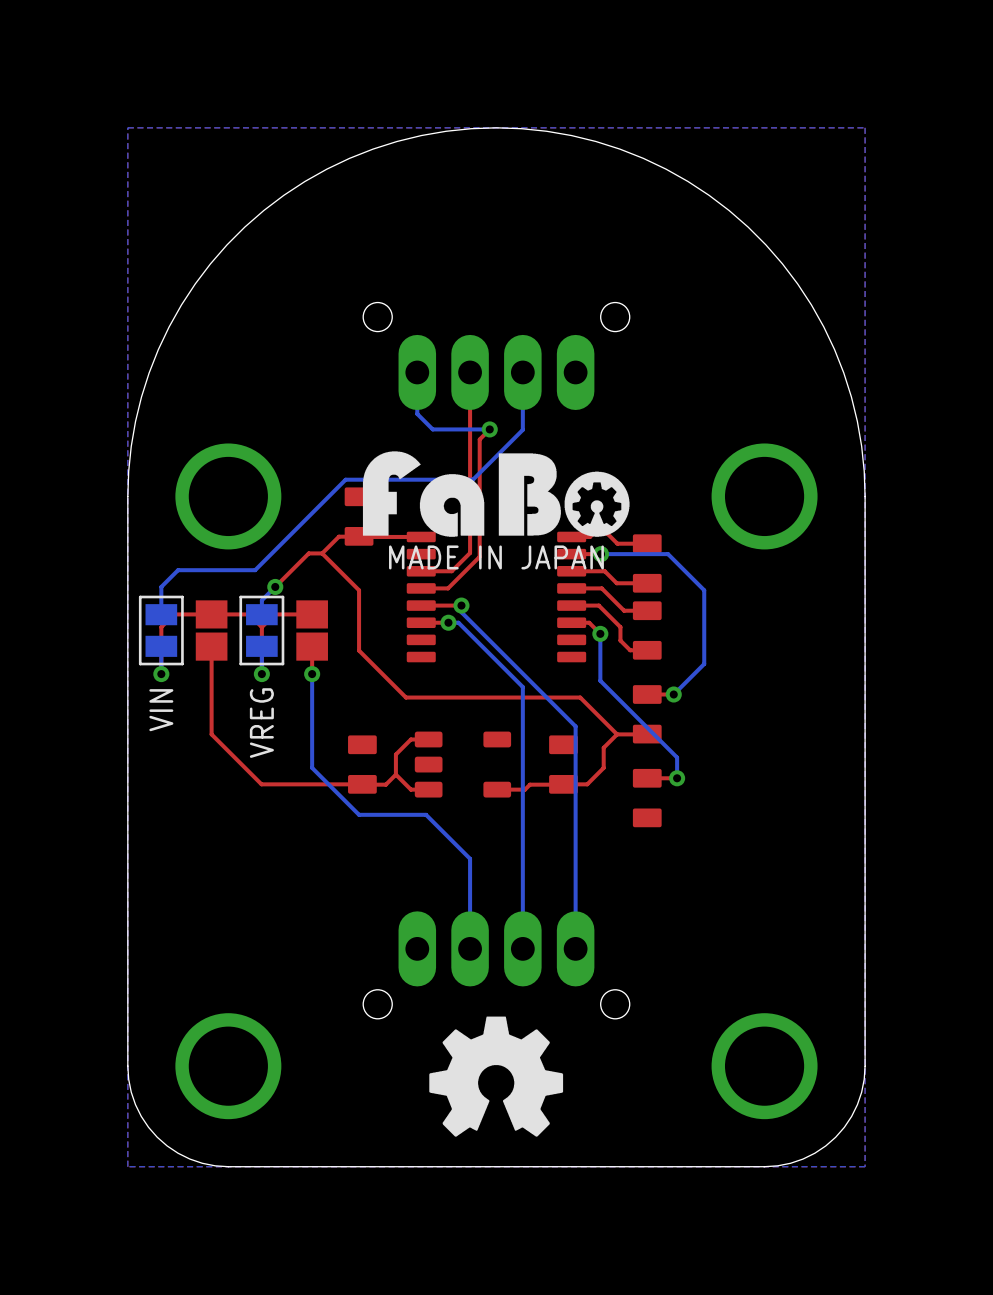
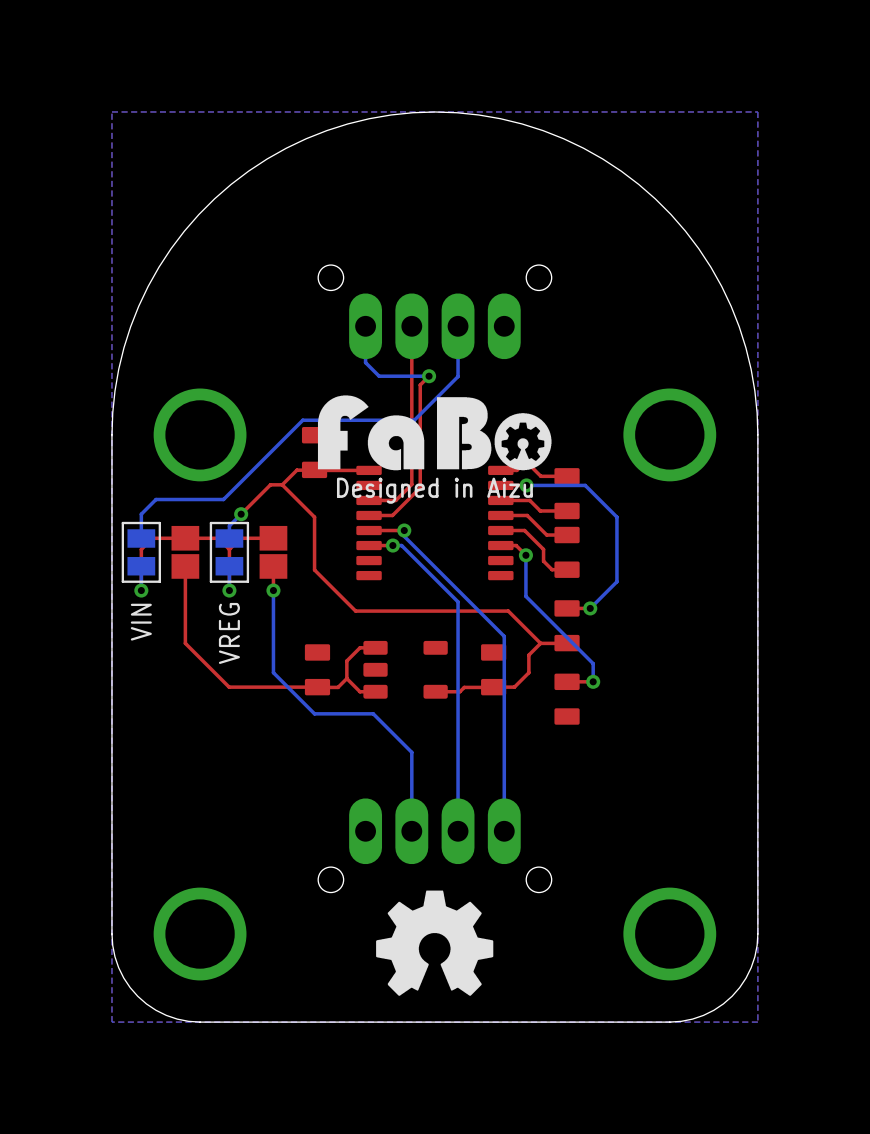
text: MADE IN JAPAN (496, 557) -> Designed in Aizu (434, 490)

